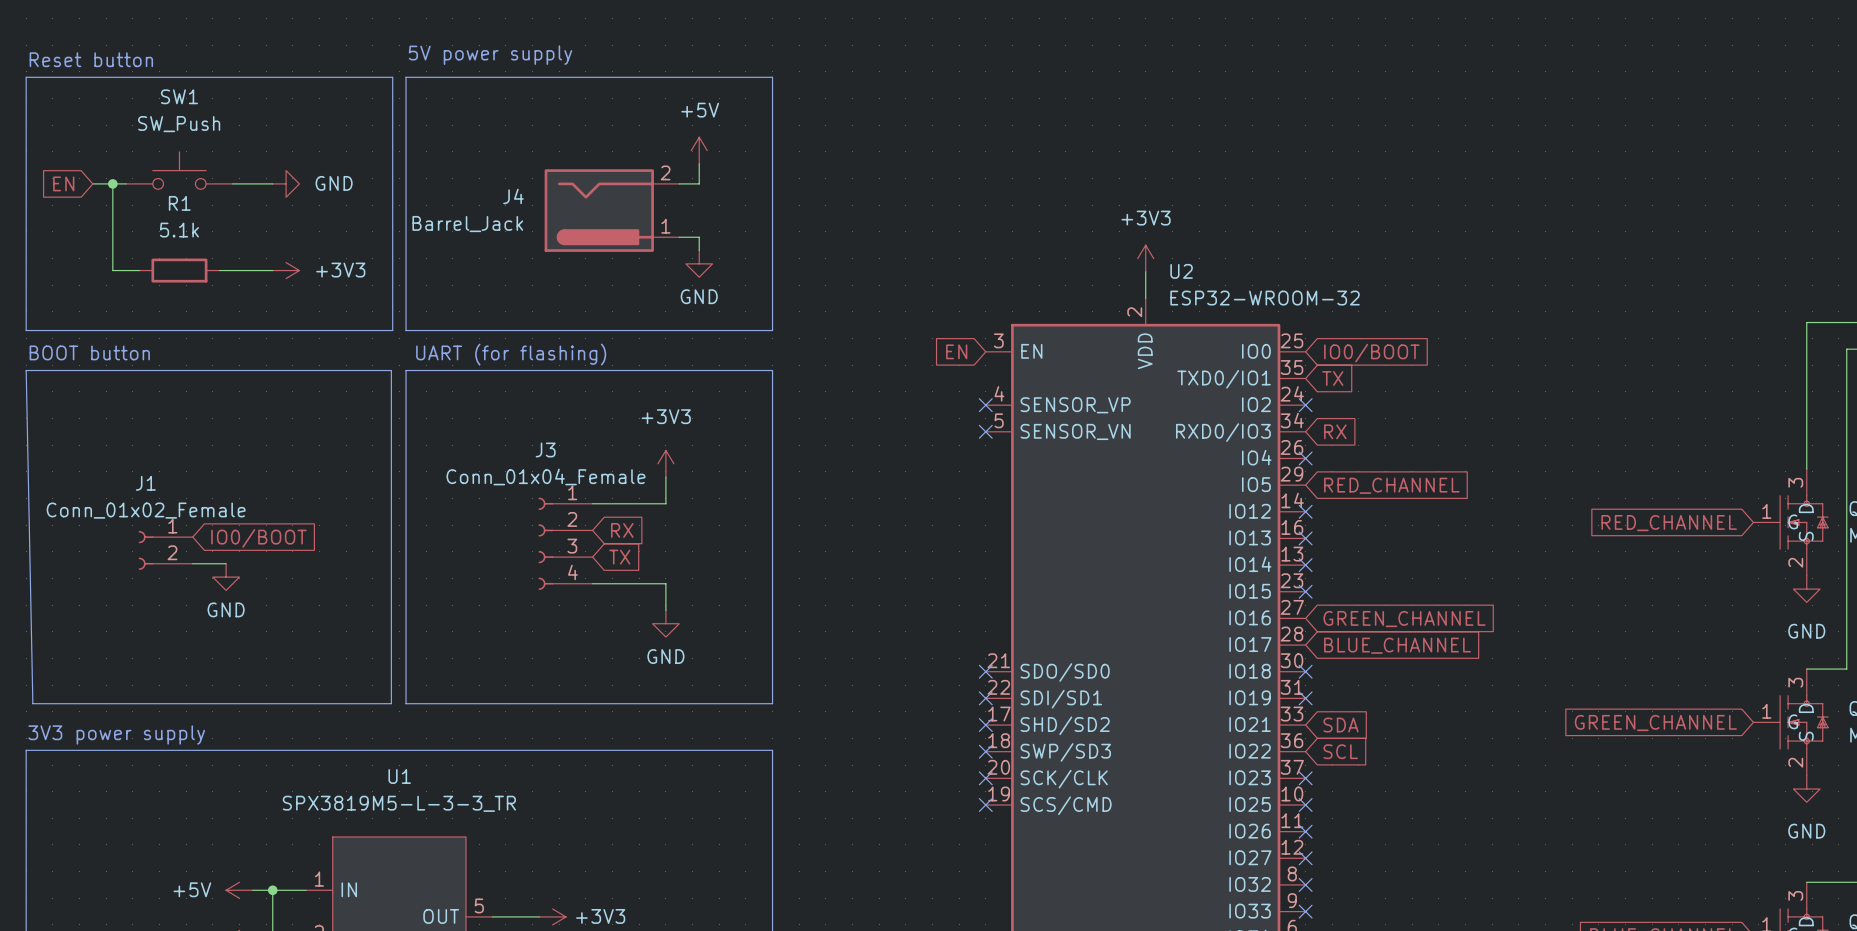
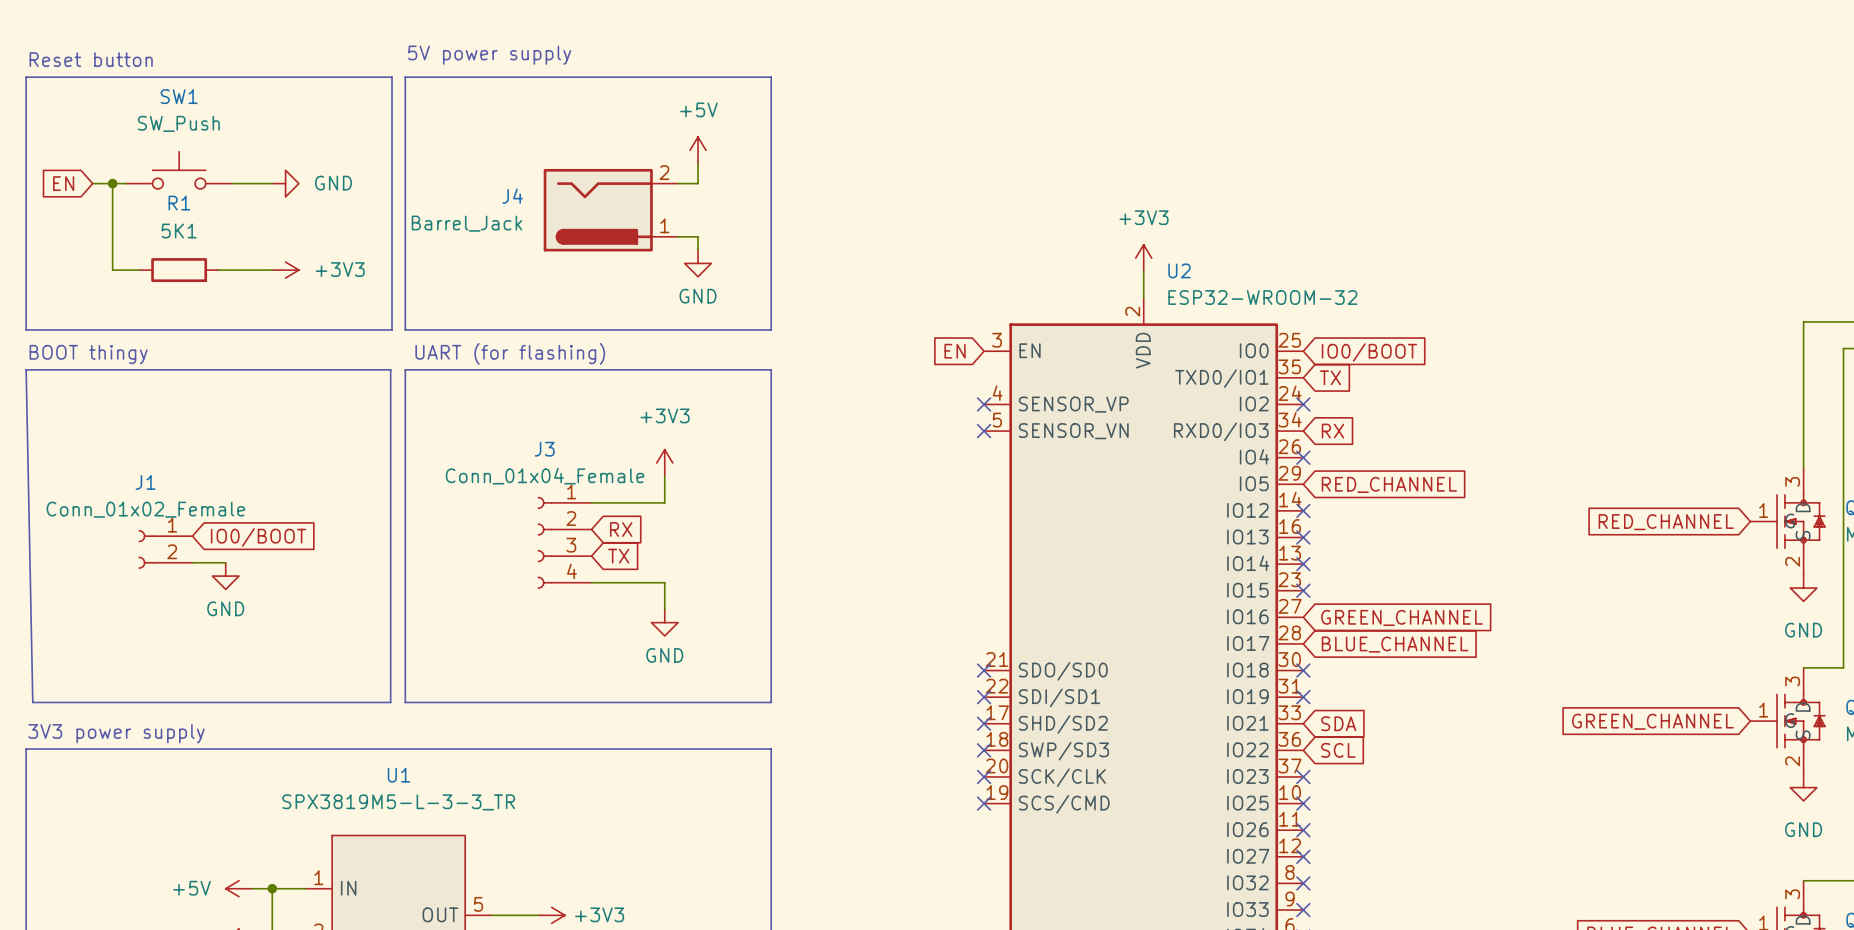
R1 value: 5.1k (179, 230) -> 5K1 (179, 231)
text: BOOT button (89, 352) -> BOOT thingy (88, 354)

